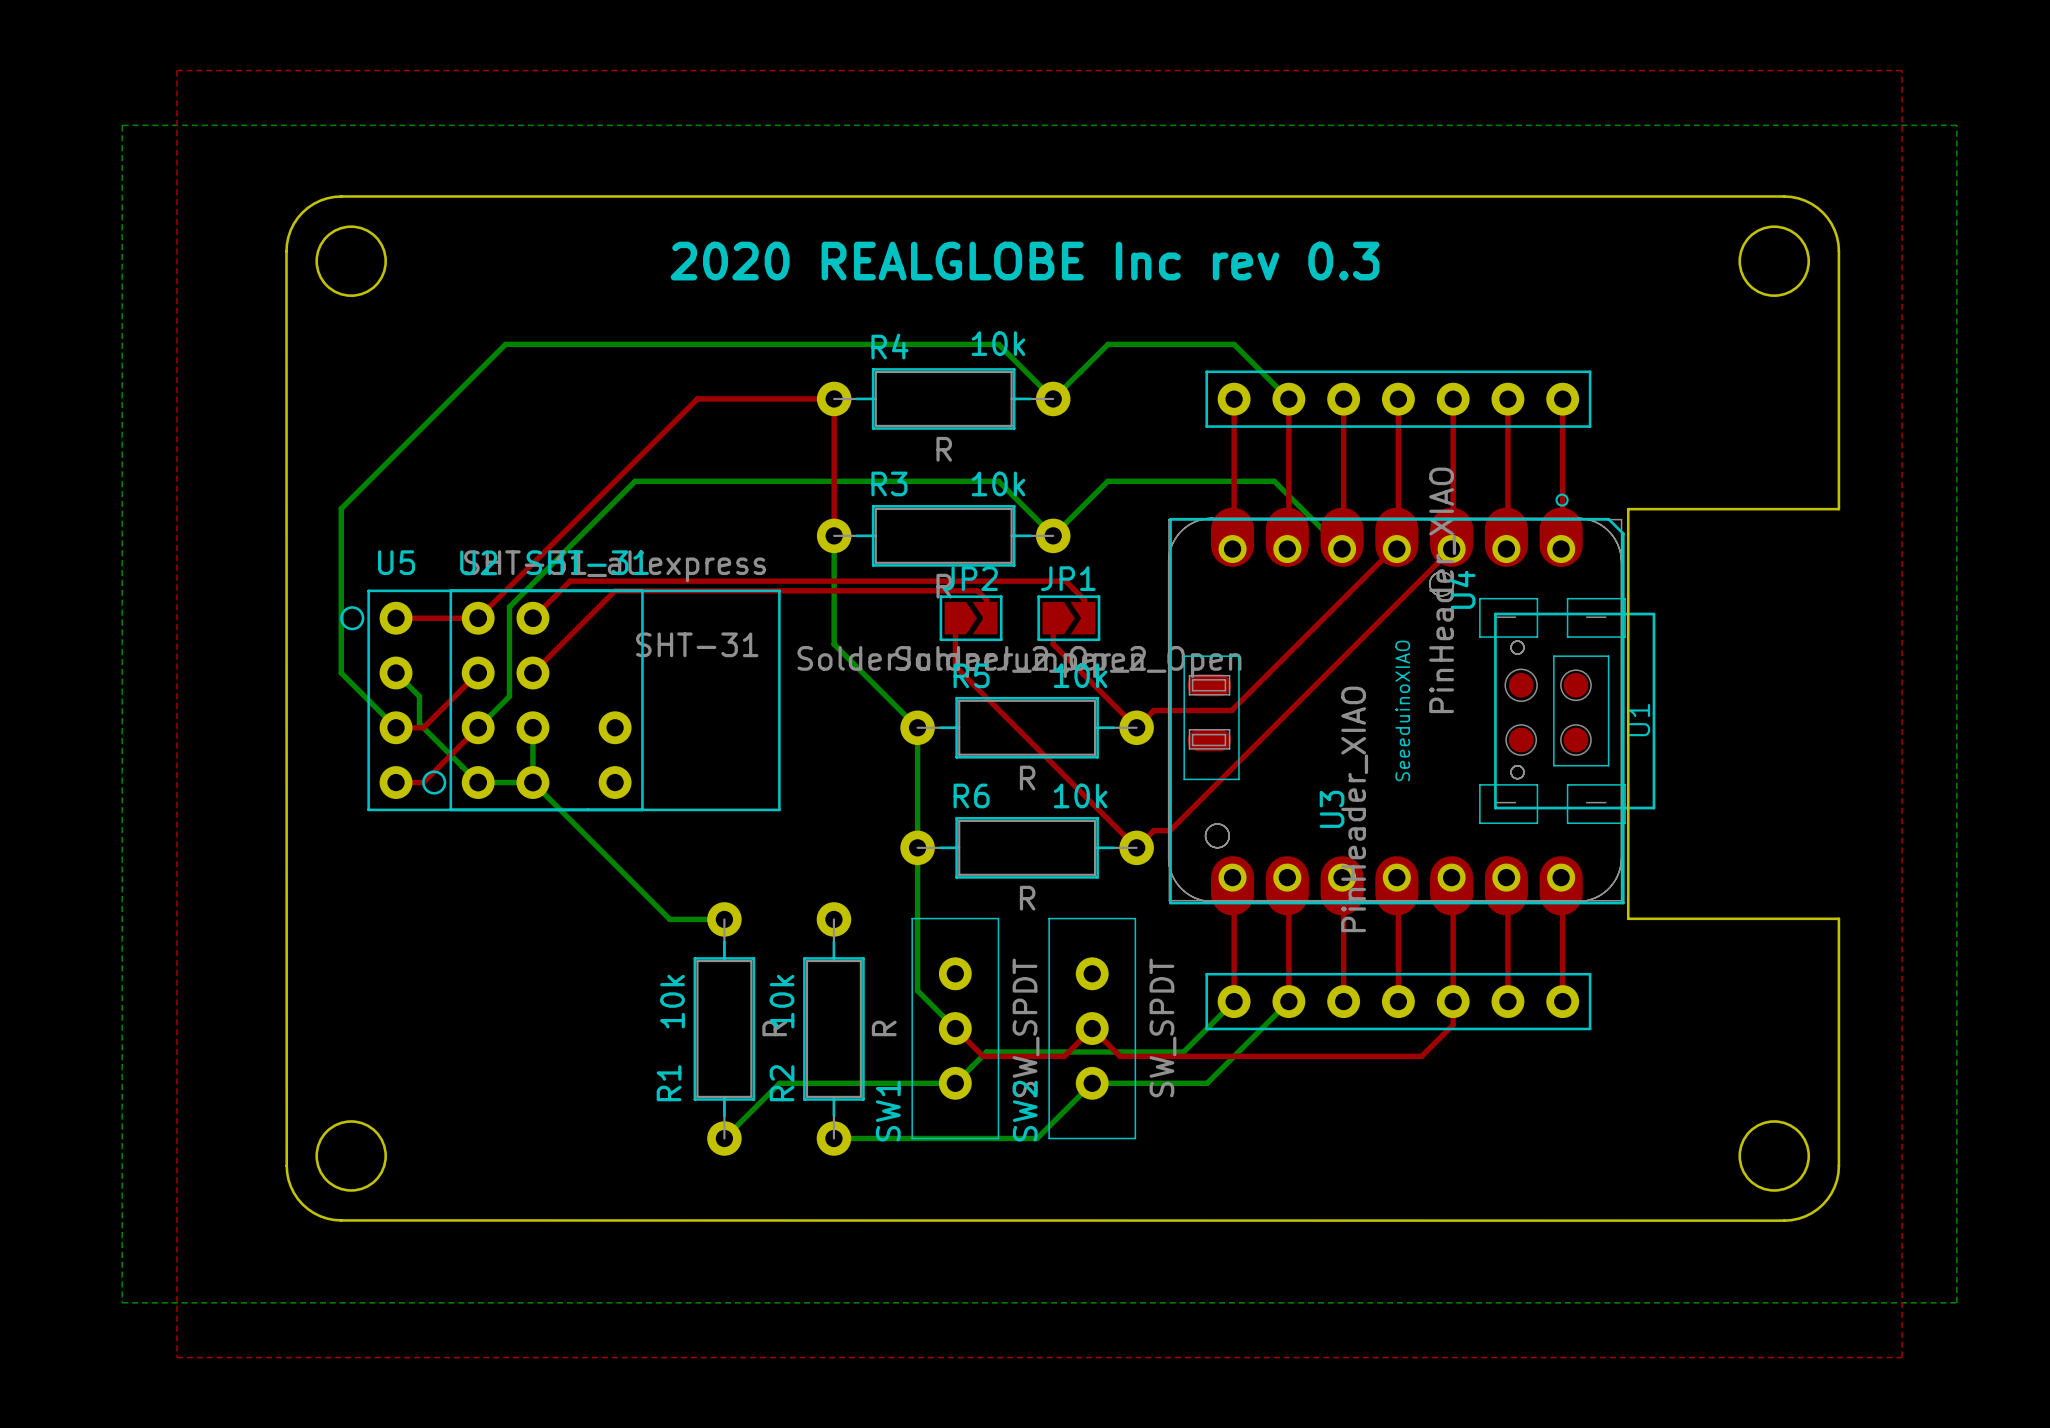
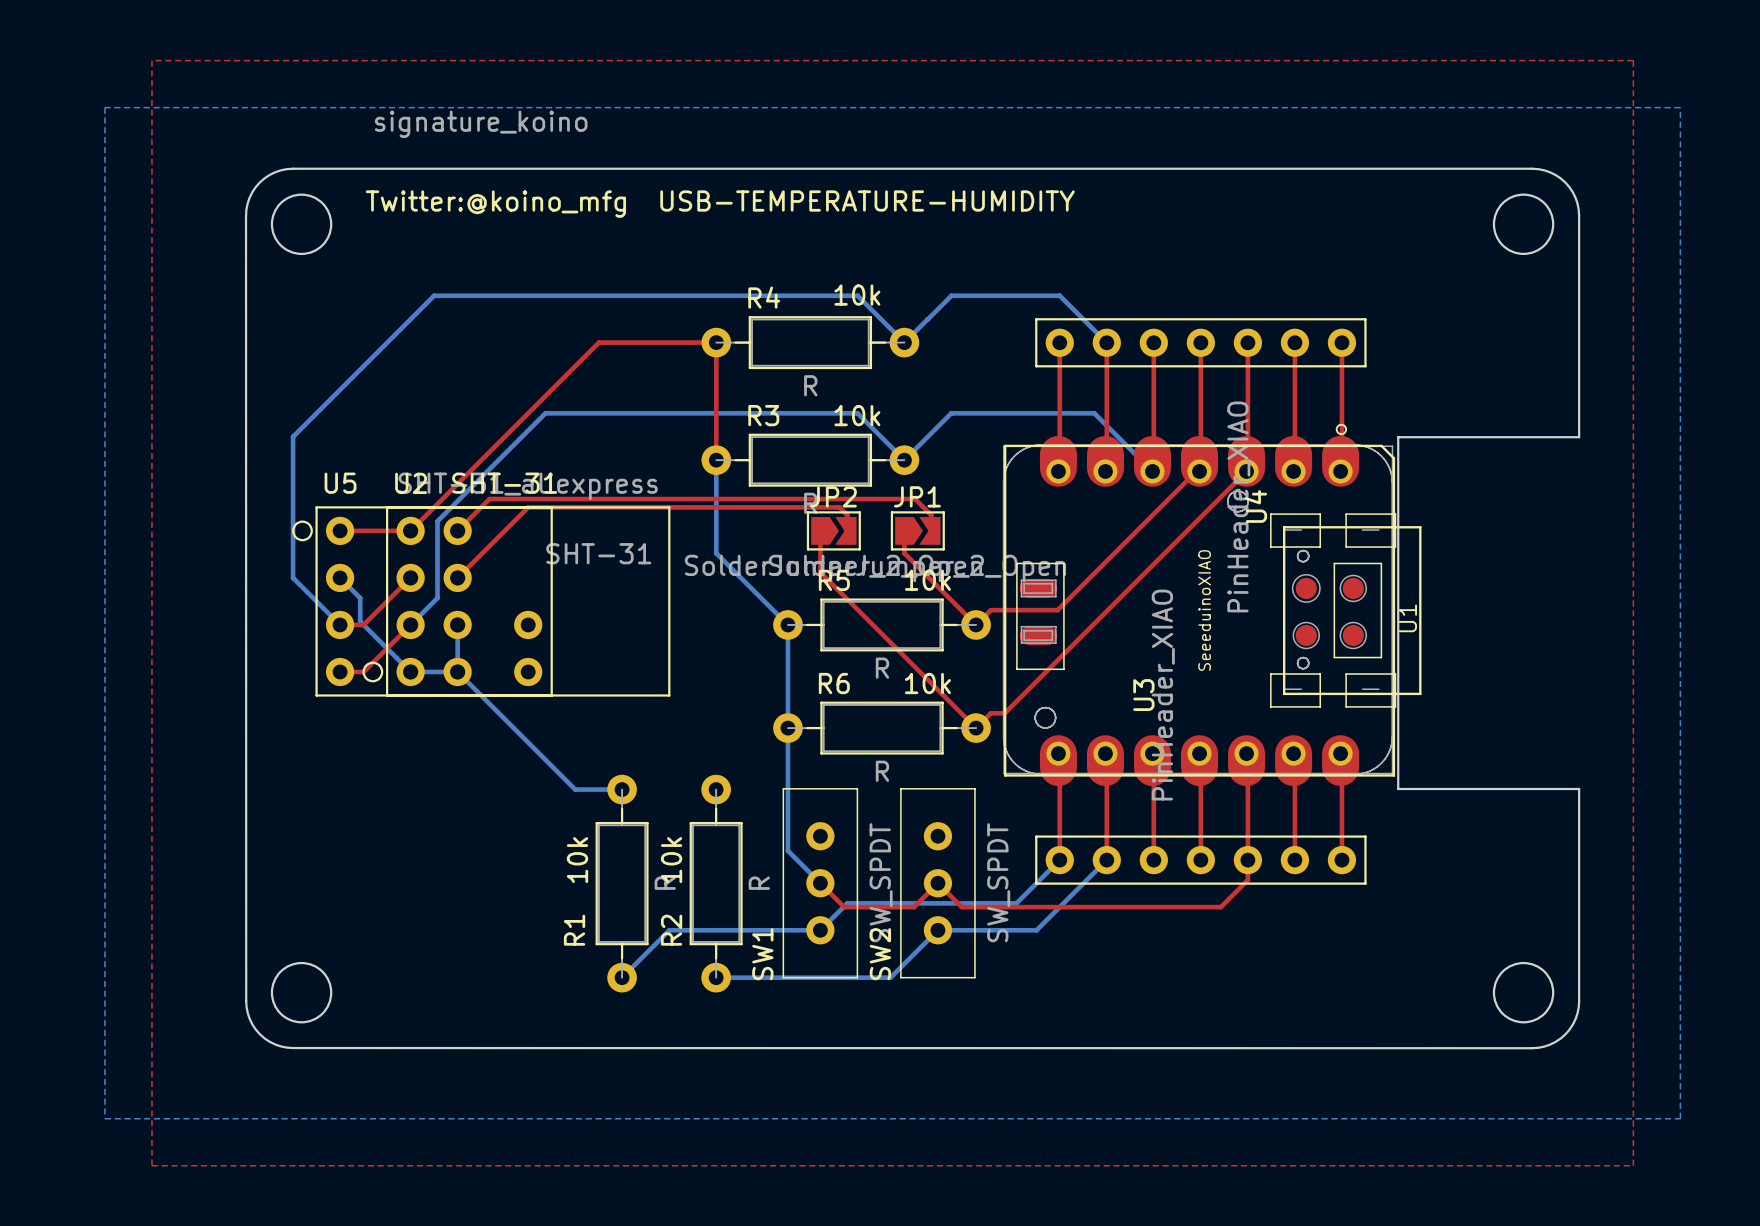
drawing: none -> [365, 110, 1075, 218]
text: 2020 REALGLOBE Inc rev 0.3 (1025, 261) -> none

